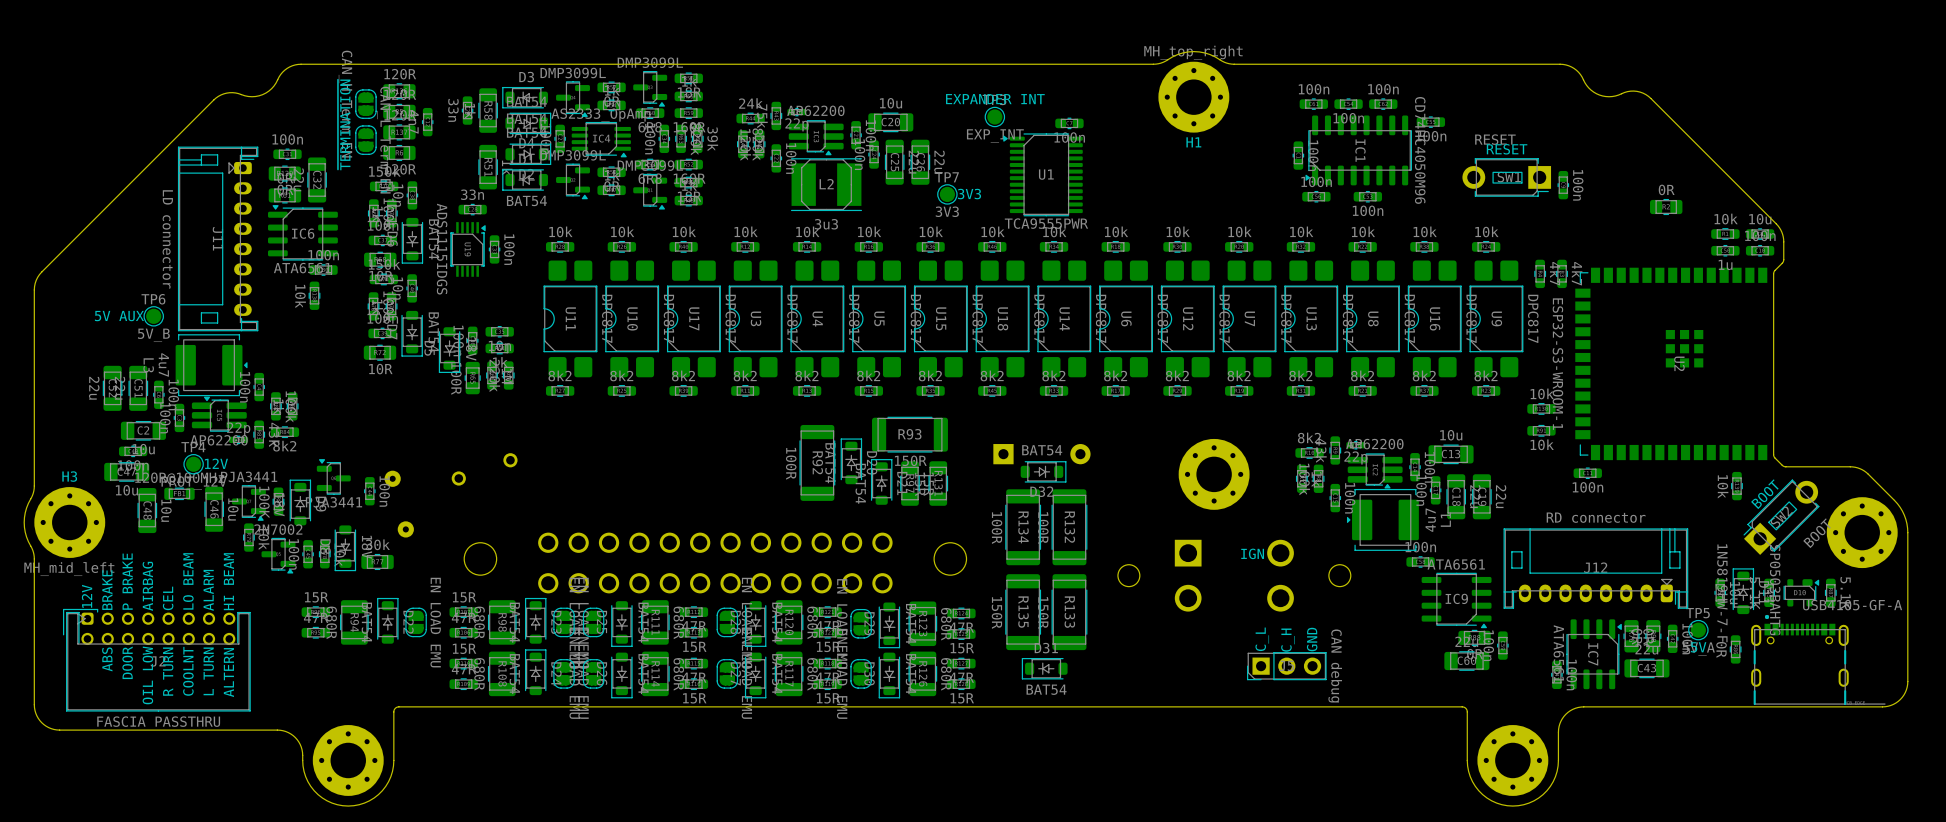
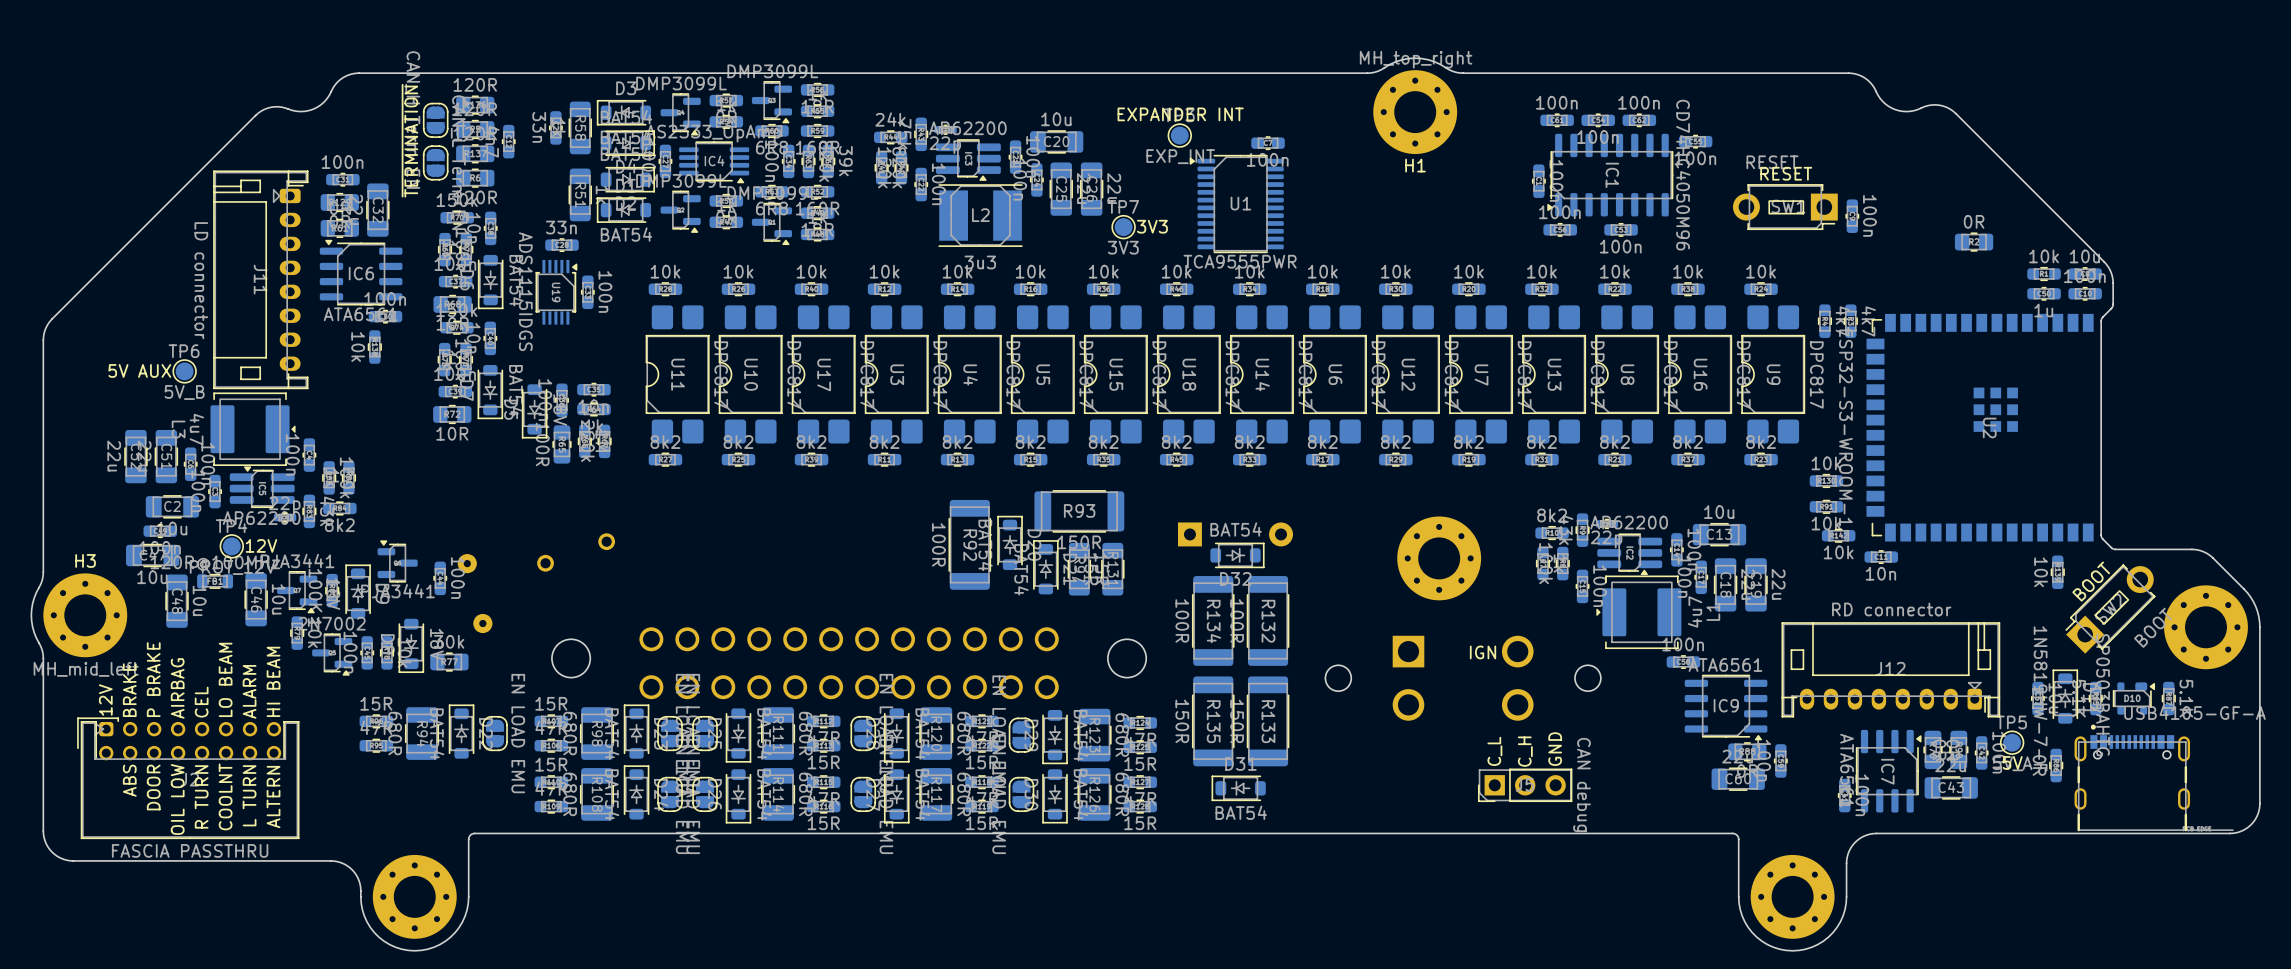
part: none -> 10k (1838, 535)
part value: 100n (1587, 487) -> 10n (1880, 573)

